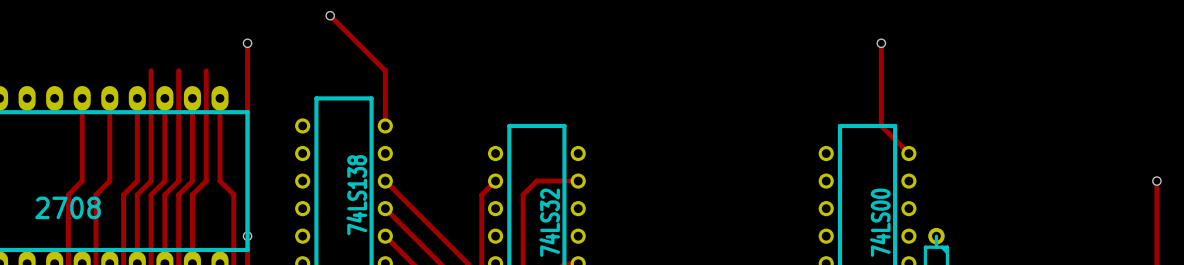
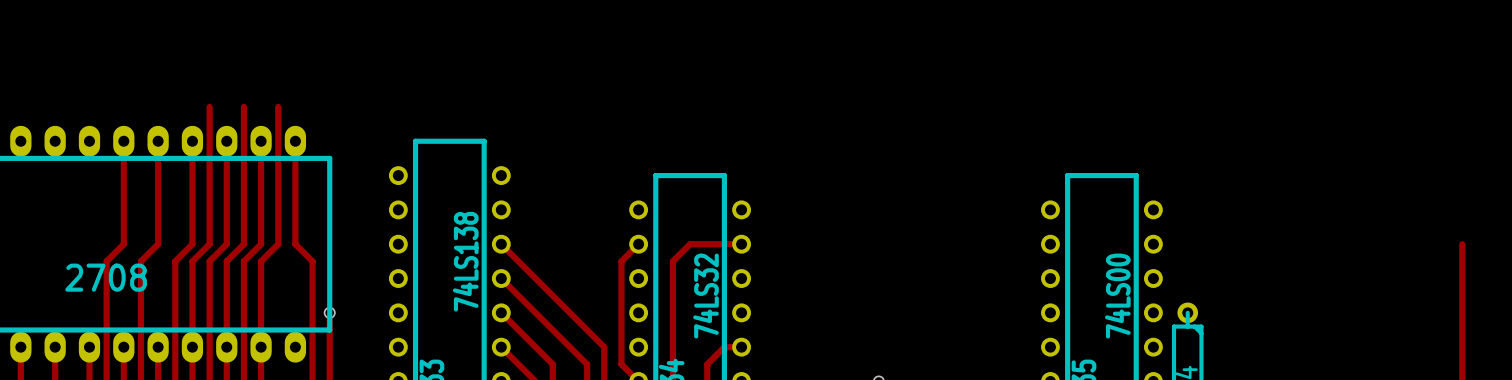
track: (330, 15) (385, 70) (385, 125) -> none
via: (330, 15) -> none
track: (247, 43) (247, 236) -> none
via: (247, 43) -> none
track: (881, 43) (881, 125) (908, 153) -> none
via: (881, 43) -> none
via: (1156, 181) -> none

